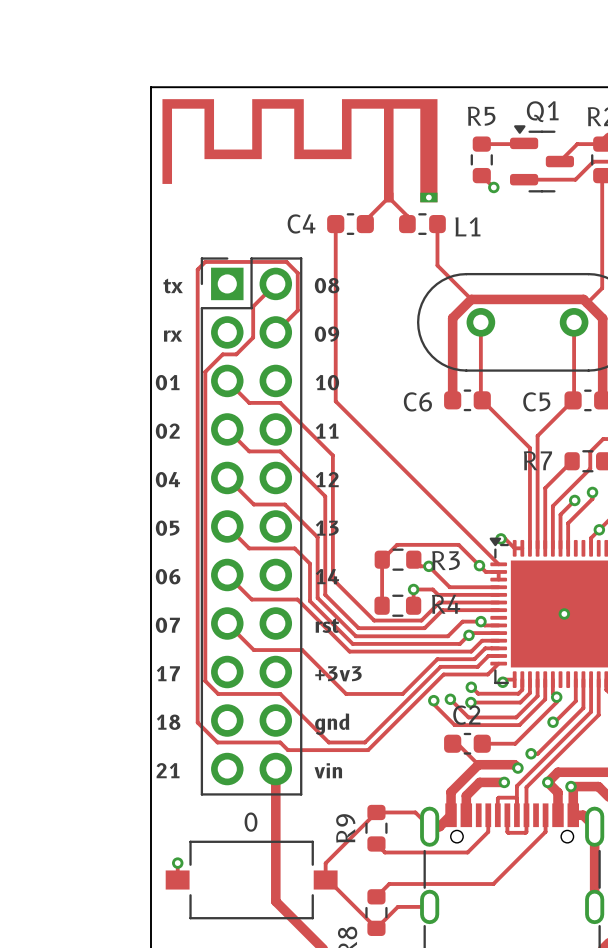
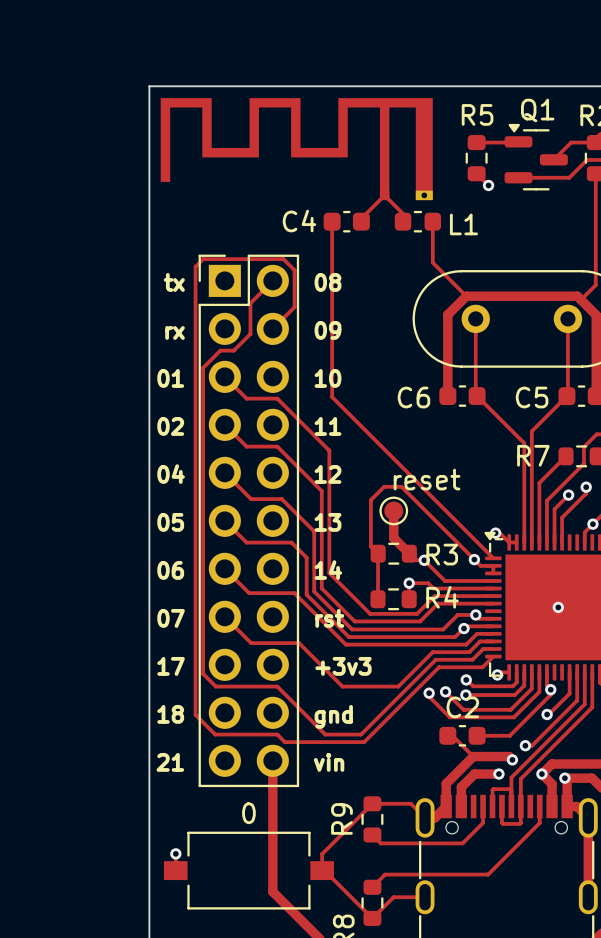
track: none -> (393, 510) (393, 538) (409, 553)
reset: none -> (393, 510)
track: (458, 544) (397, 544) (382, 559) -> (453, 539) (401, 486) (384, 486) (370, 500) (370, 546) (378, 553)

